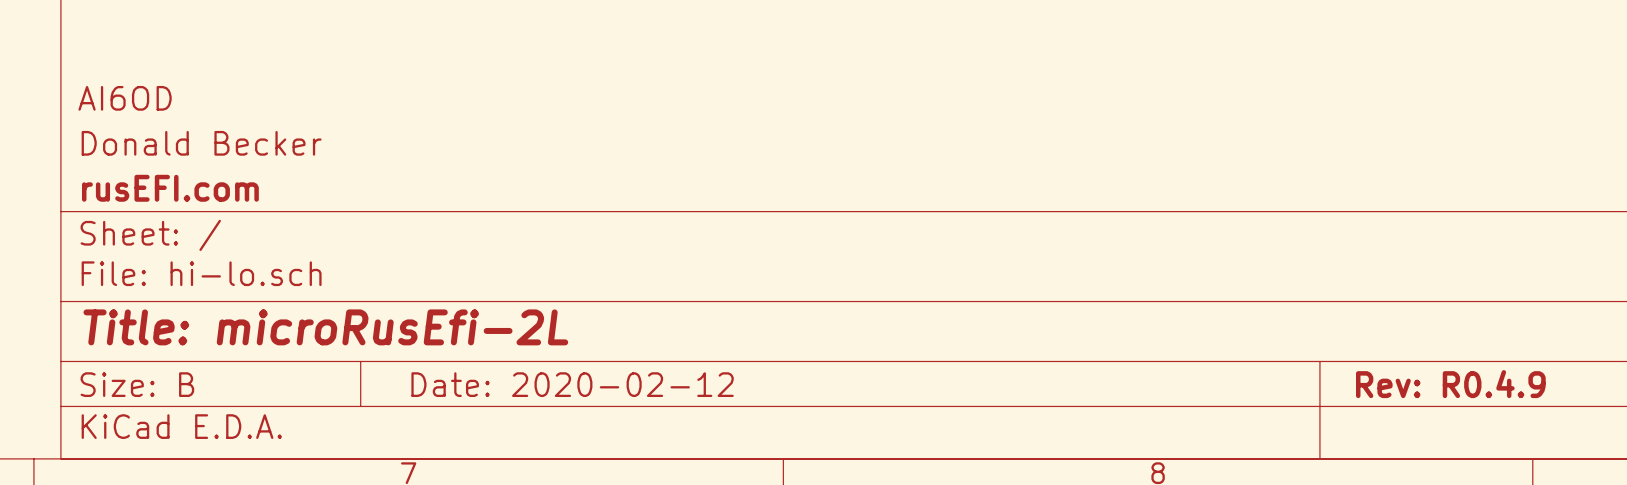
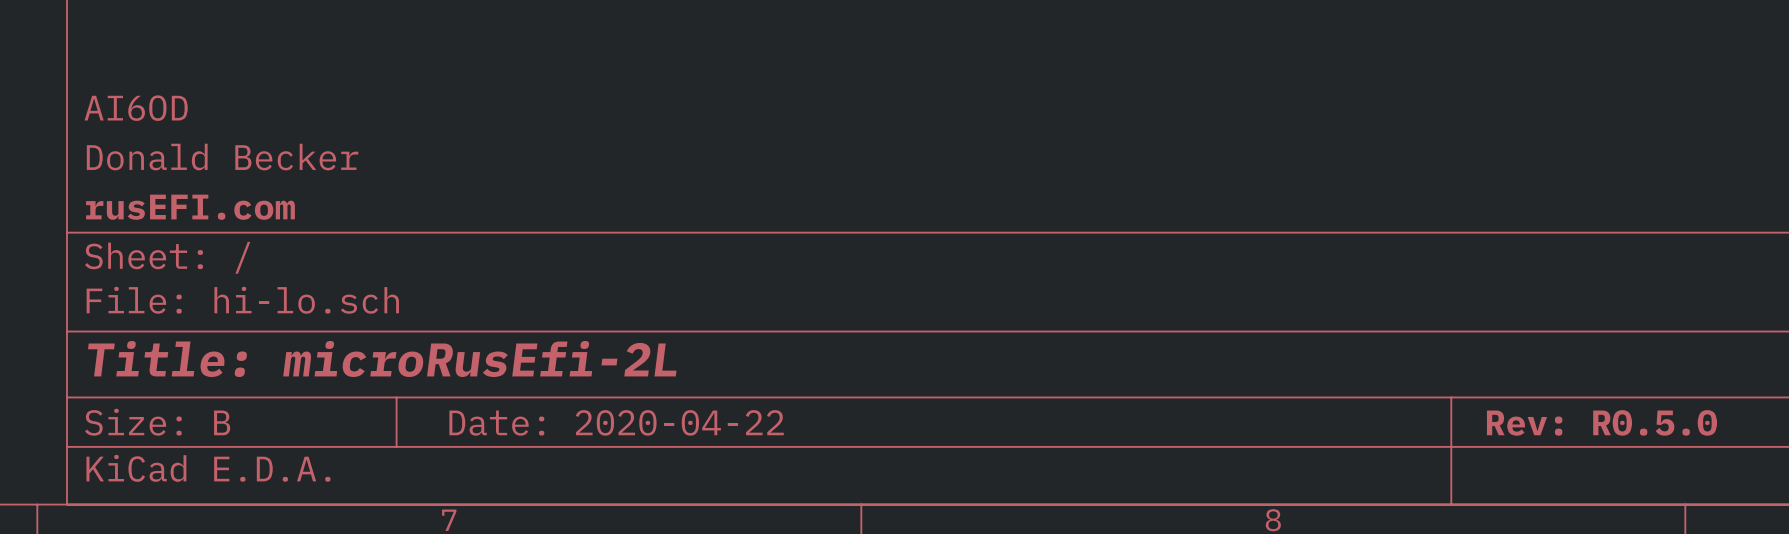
title block: Date: 2020-02-12 (572, 384) -> Date: 2020-04-22 (616, 422)
title block: Rev: R0.4.9 (1450, 384) -> Rev: R0.5.0 (1601, 422)

